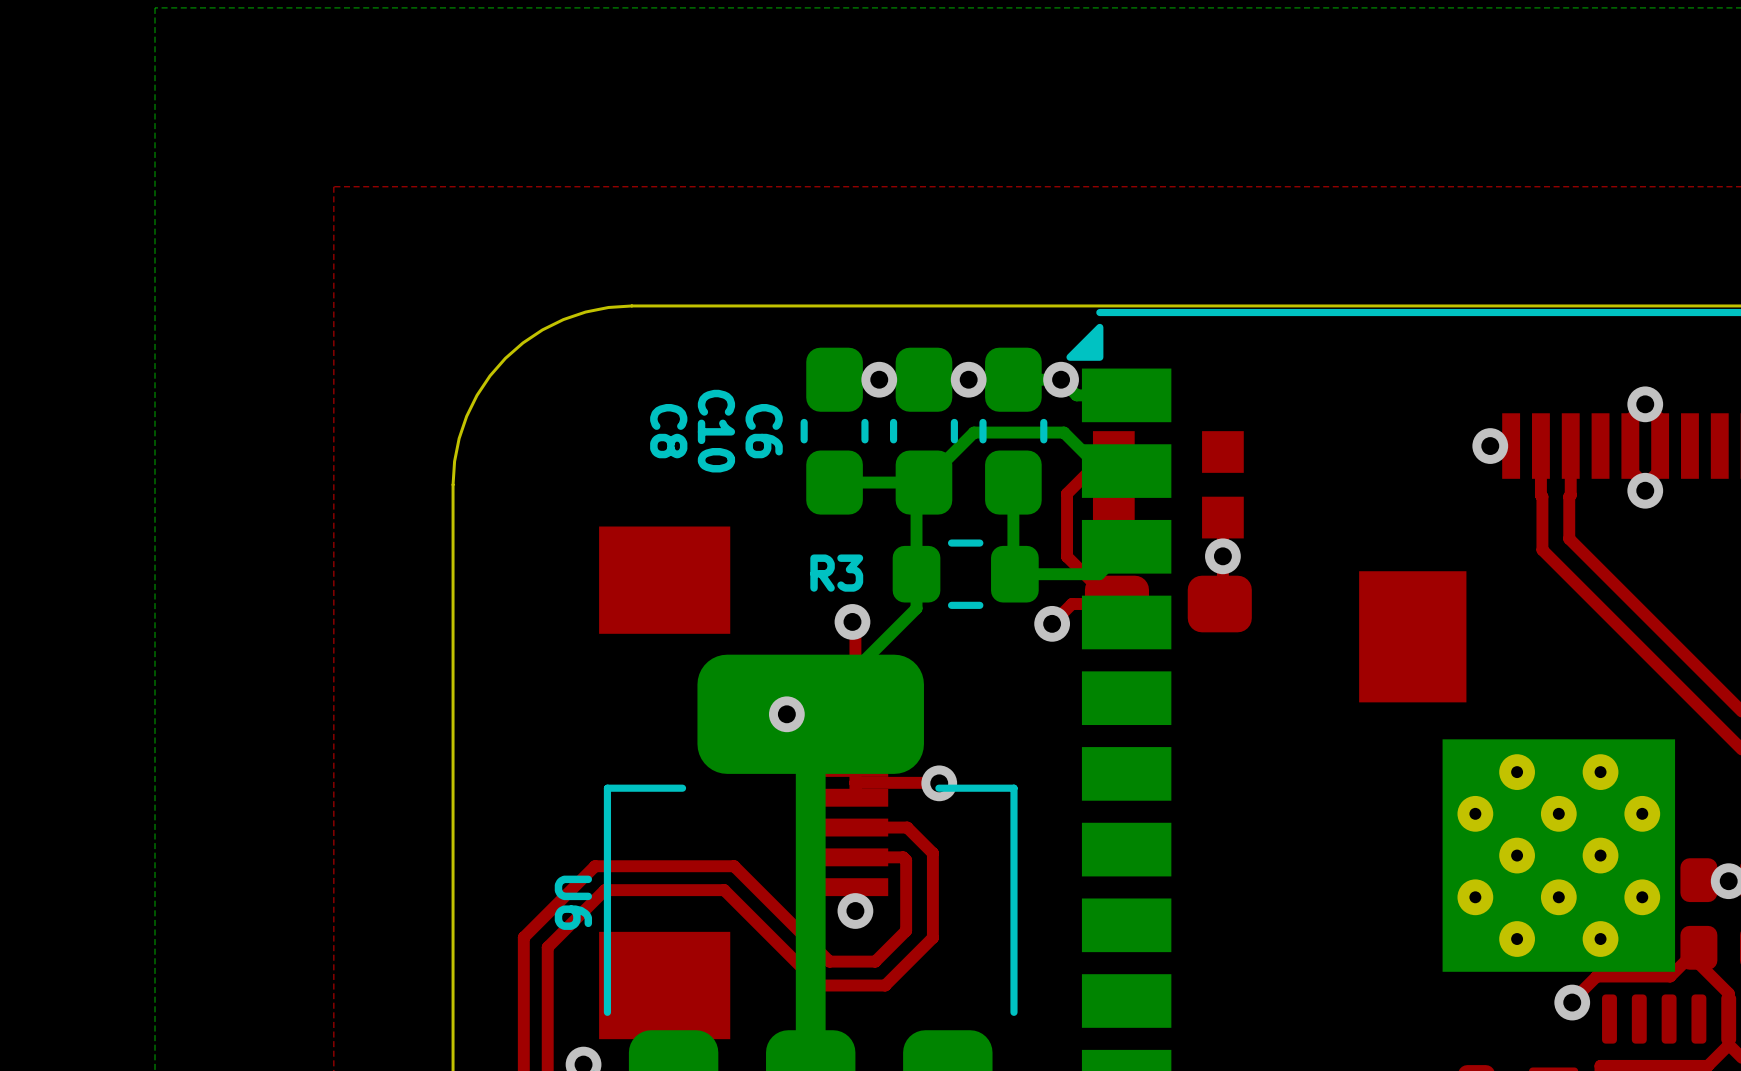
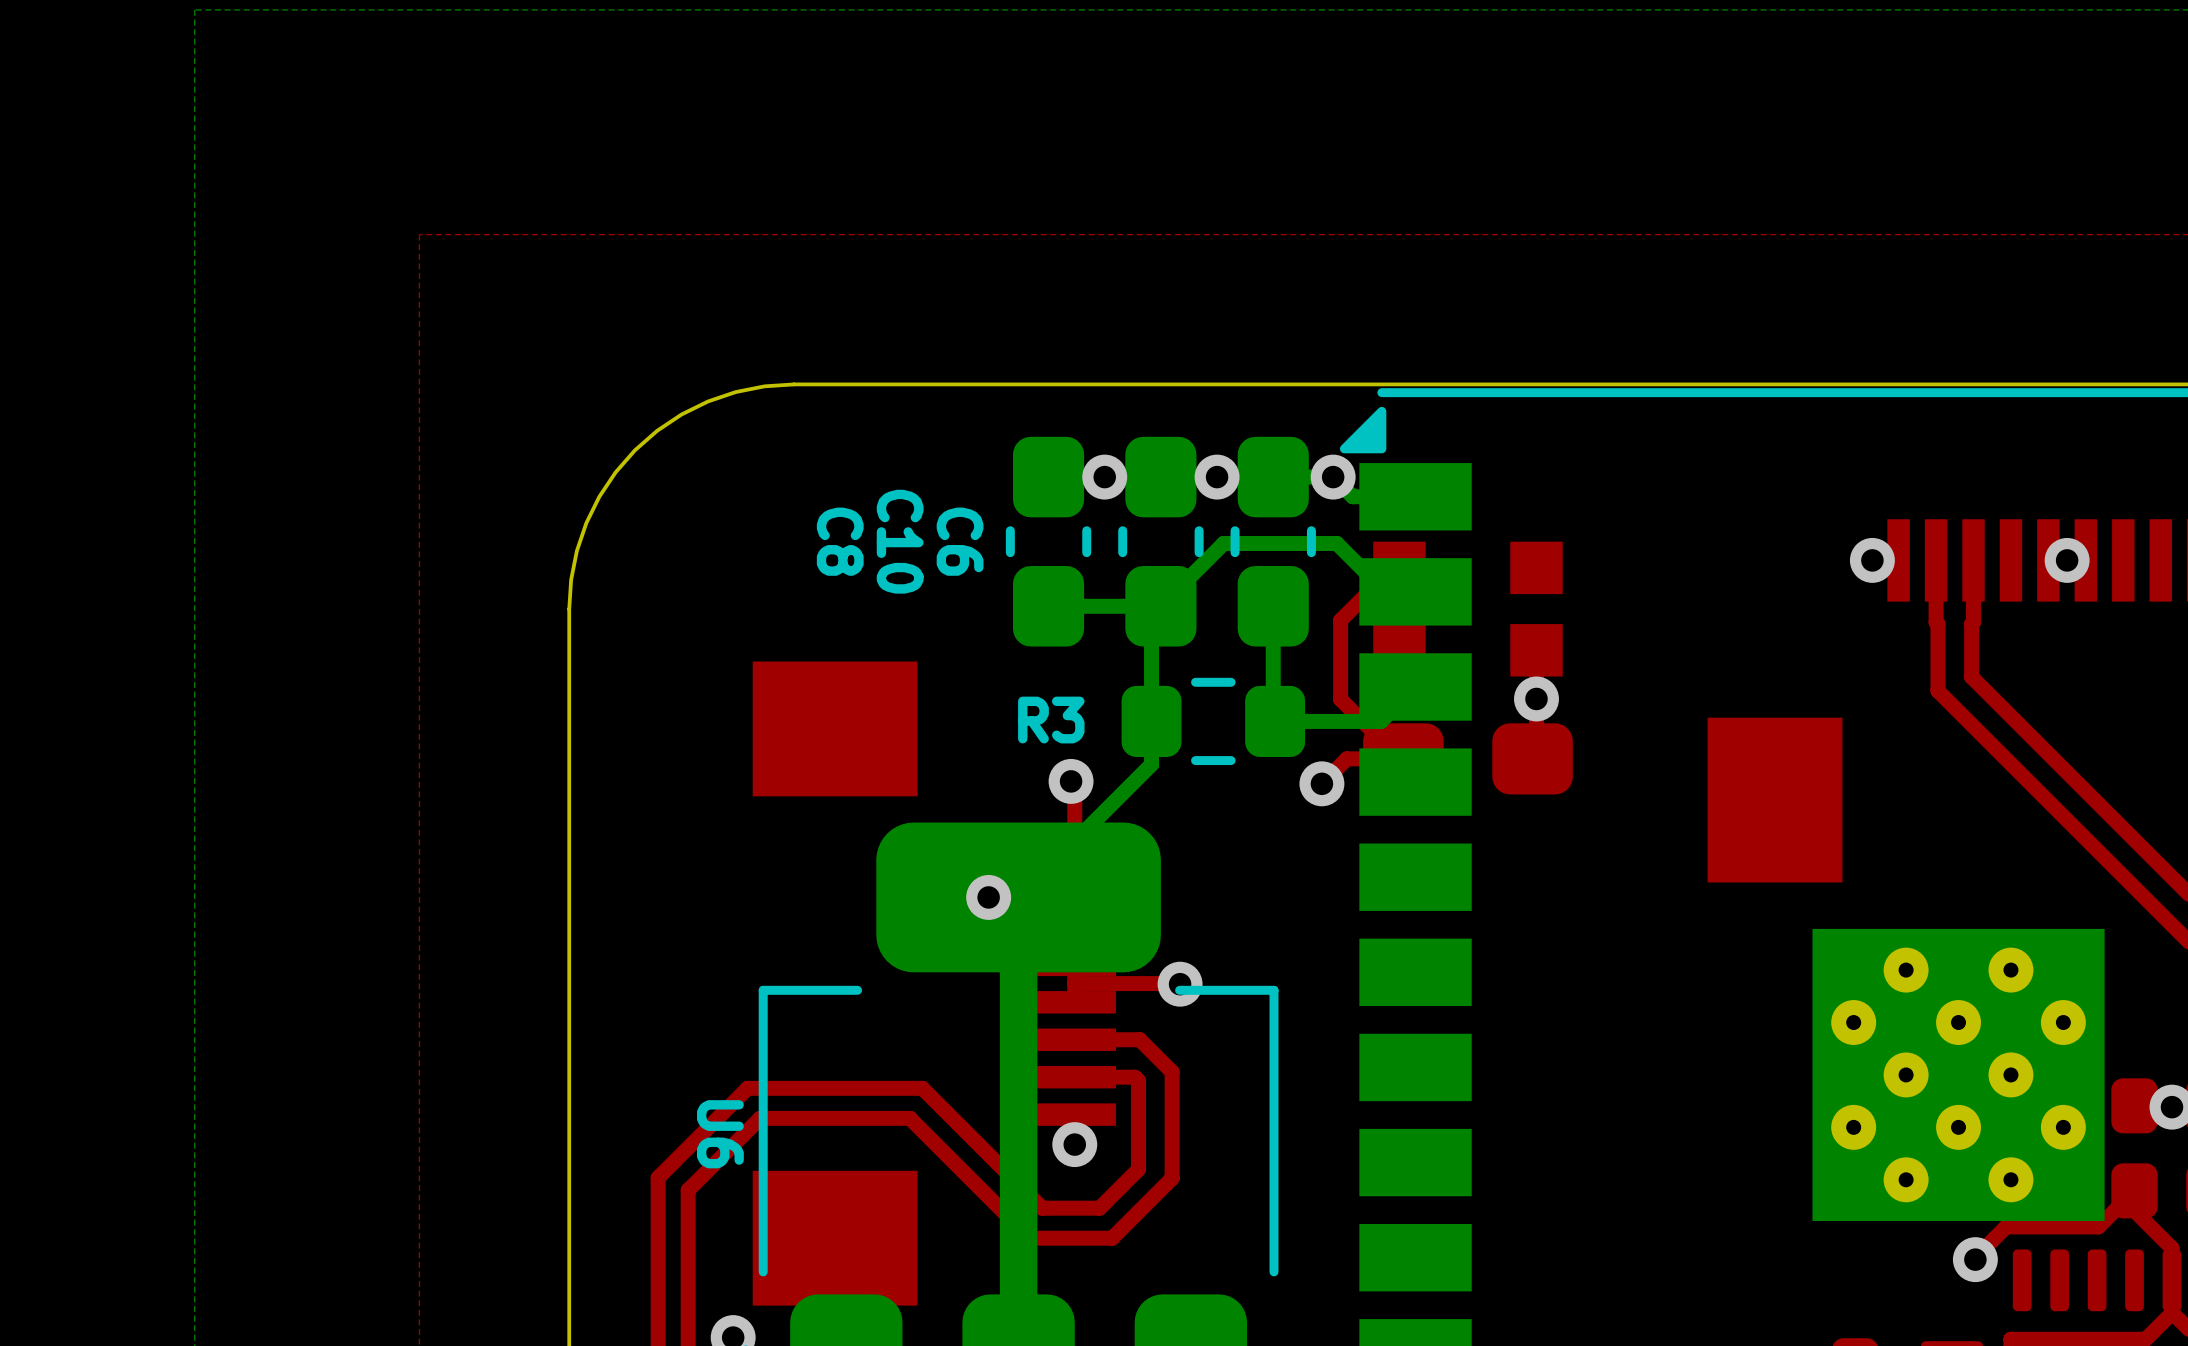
via: (1645, 404) -> none
via: none -> (2067, 560)
via: (1645, 490) -> none

